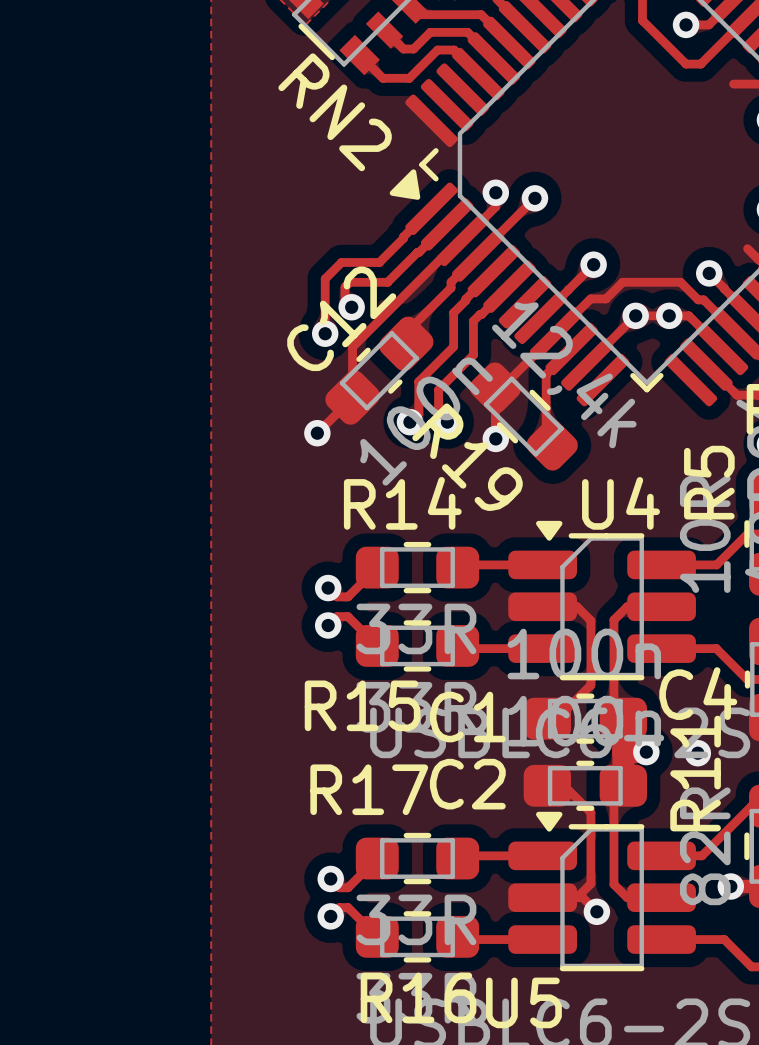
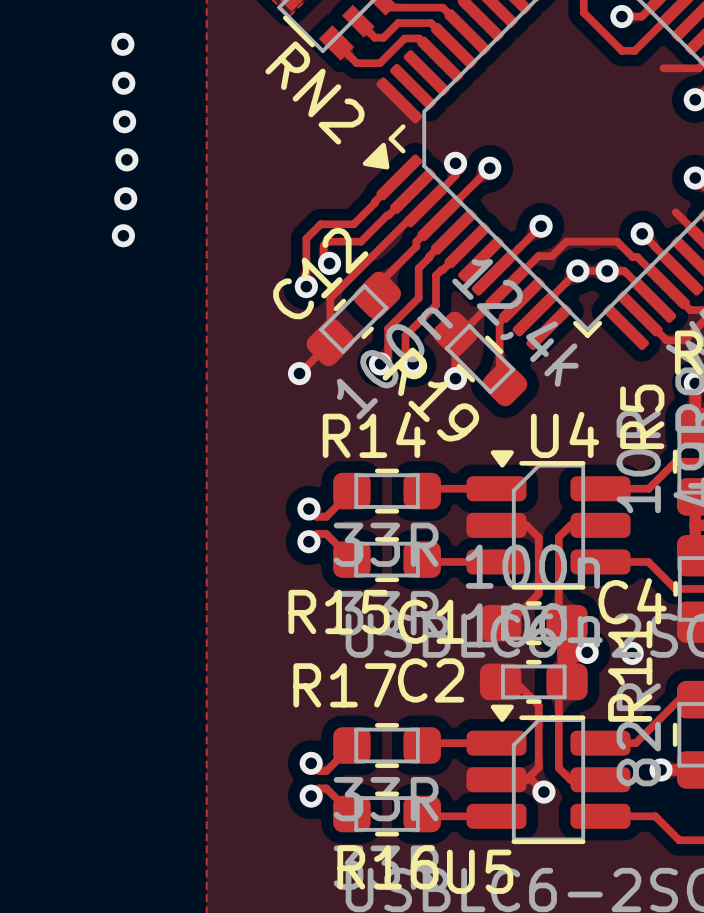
via: none -> (122, 44)
via: none -> (123, 83)
via: none -> (124, 121)
via: none -> (126, 159)
via: none -> (125, 198)
via: none -> (123, 235)

